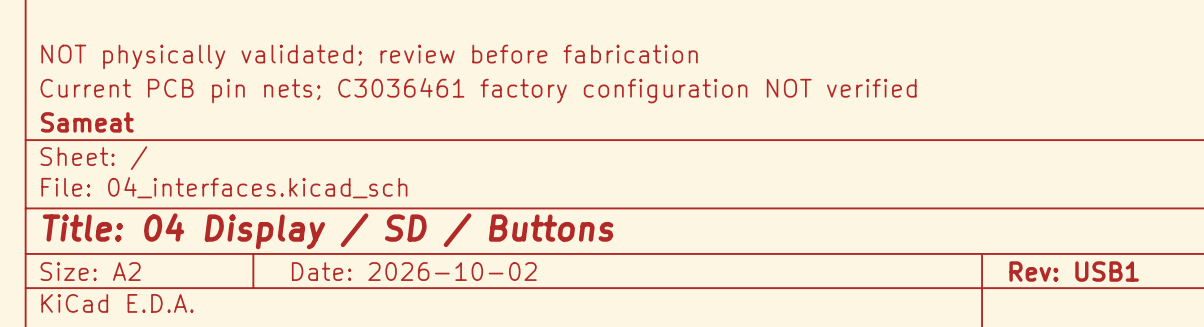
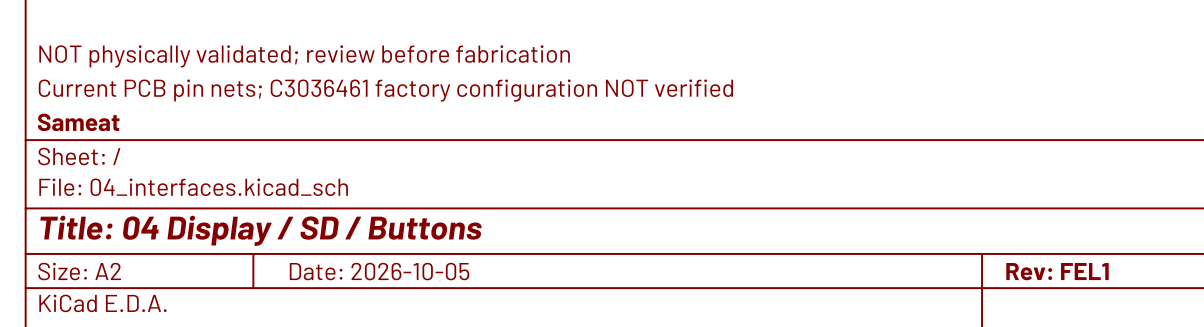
title block: Date: 2026-10-02 (414, 271) -> Date: 2026-10-05 (379, 271)
title block: Rev: USB1 (1074, 271) -> Rev: FEL1 (1057, 271)

